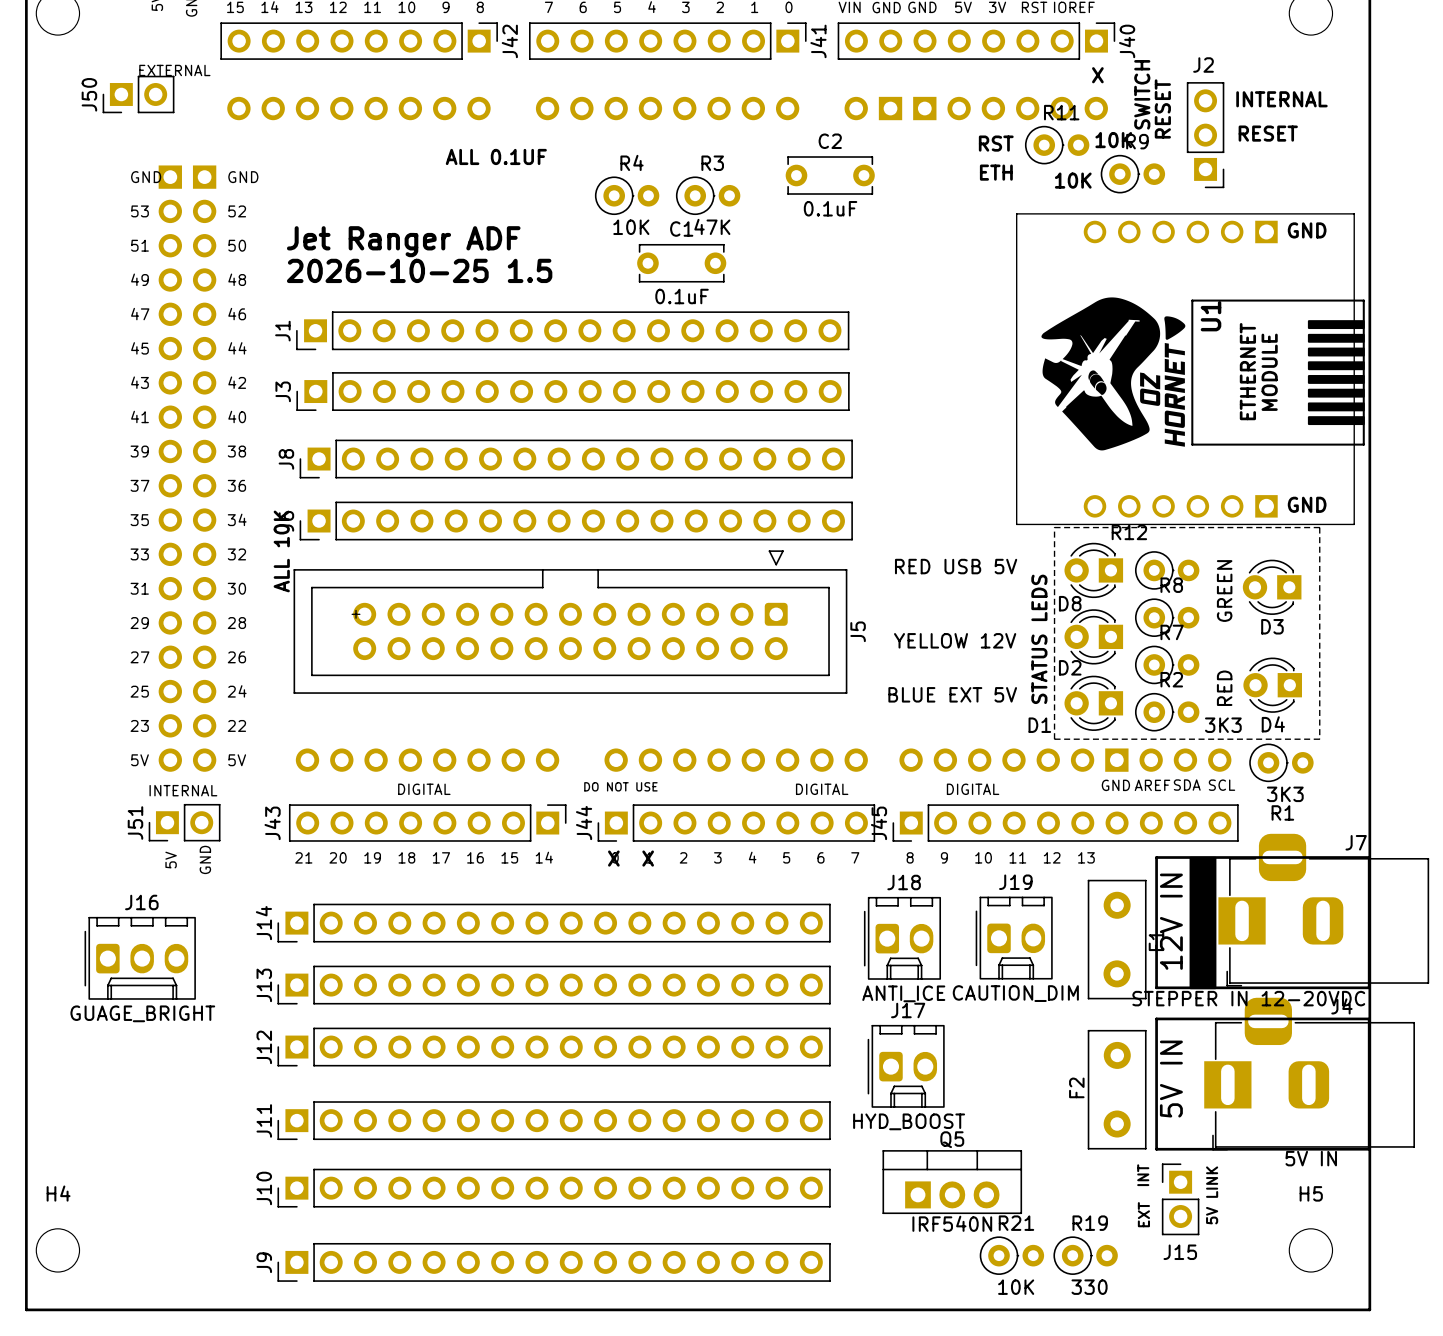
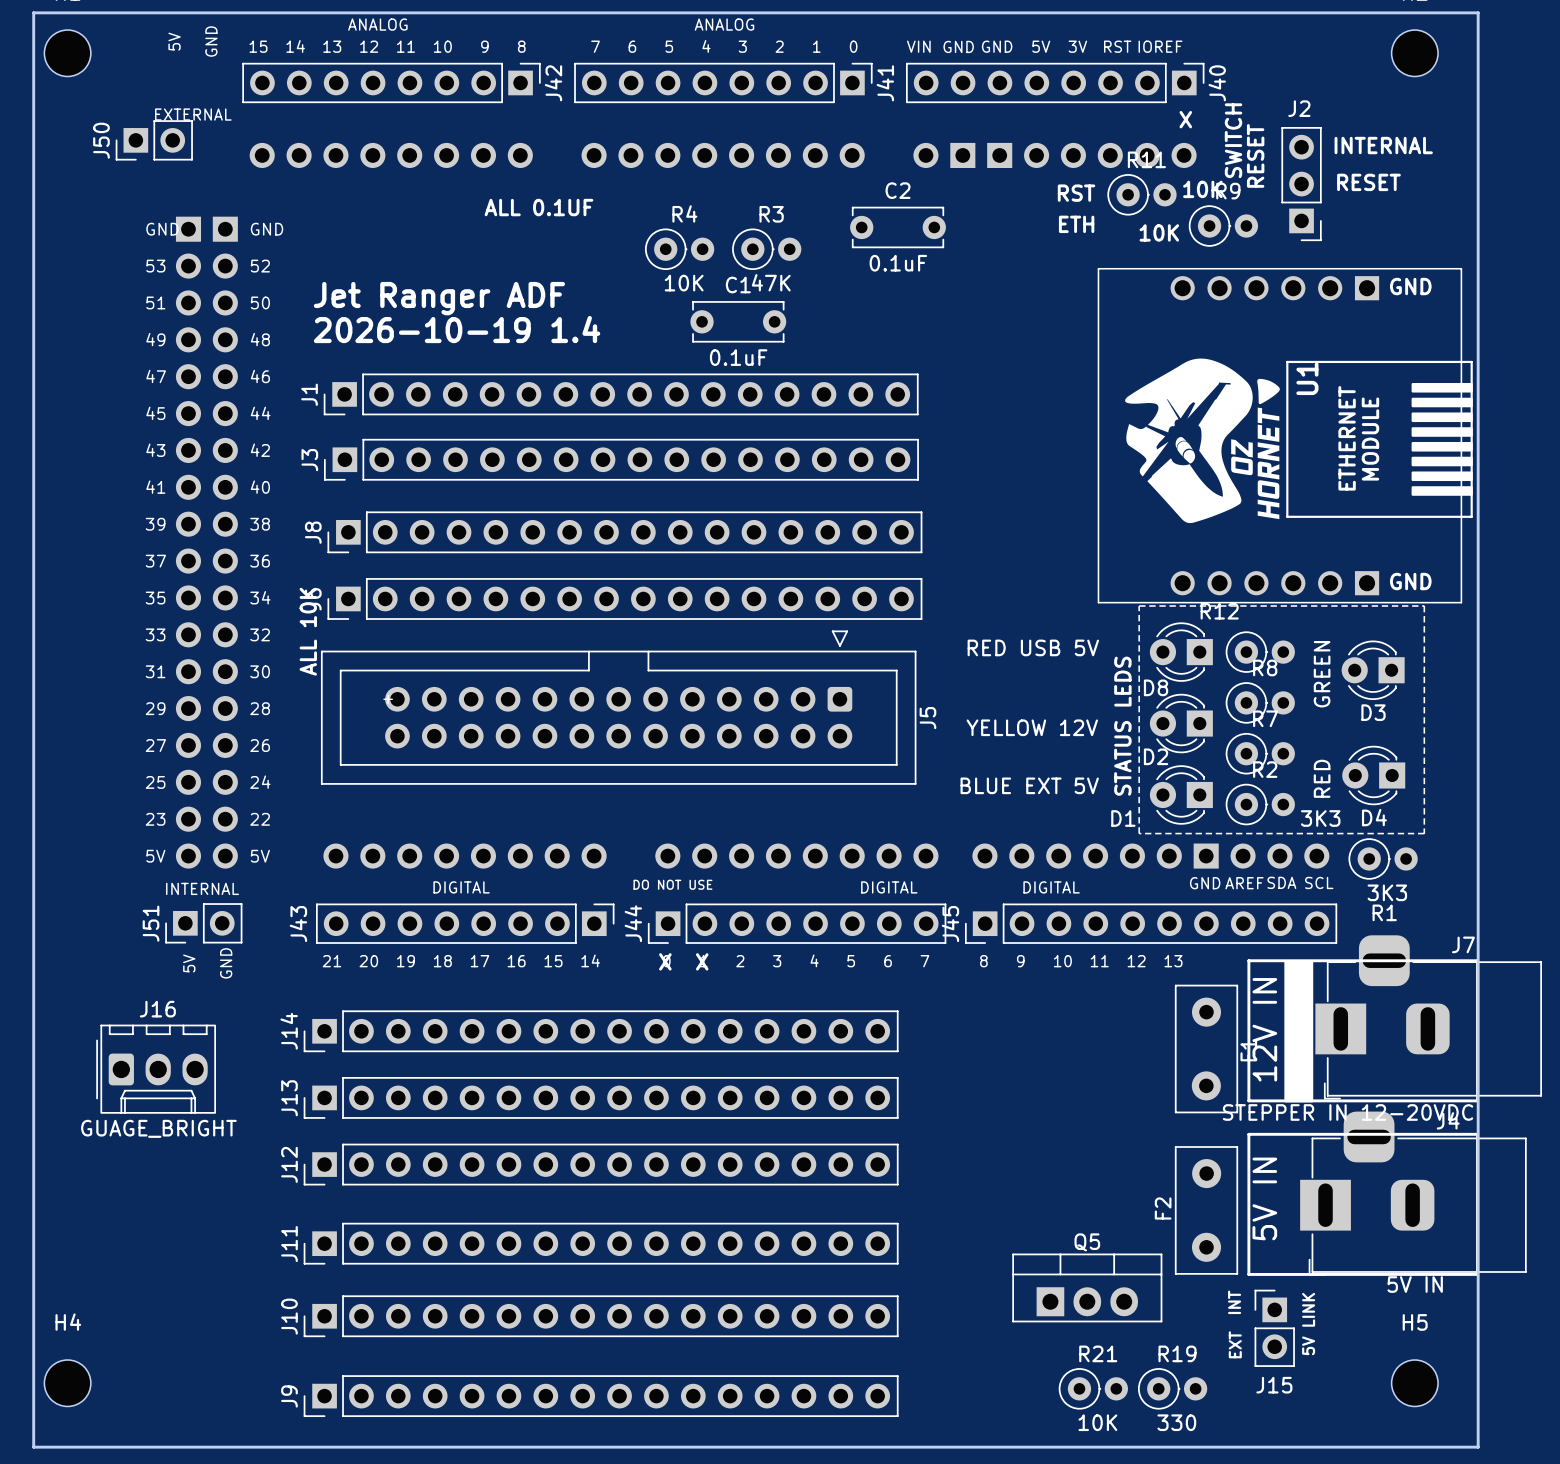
text: 2026-10-25 1.5 (419, 270) -> 2026-10-19 1.4 (457, 329)
J18: ANTI_ICE (902, 938) -> none
J19: CAUTION_DIM (1014, 938) -> none
J17: HYD_BOOST (906, 1066) -> none
Q5 position: (952, 1182) -> (1087, 1287)
Q5 value: IRF540N (952, 1223) -> none

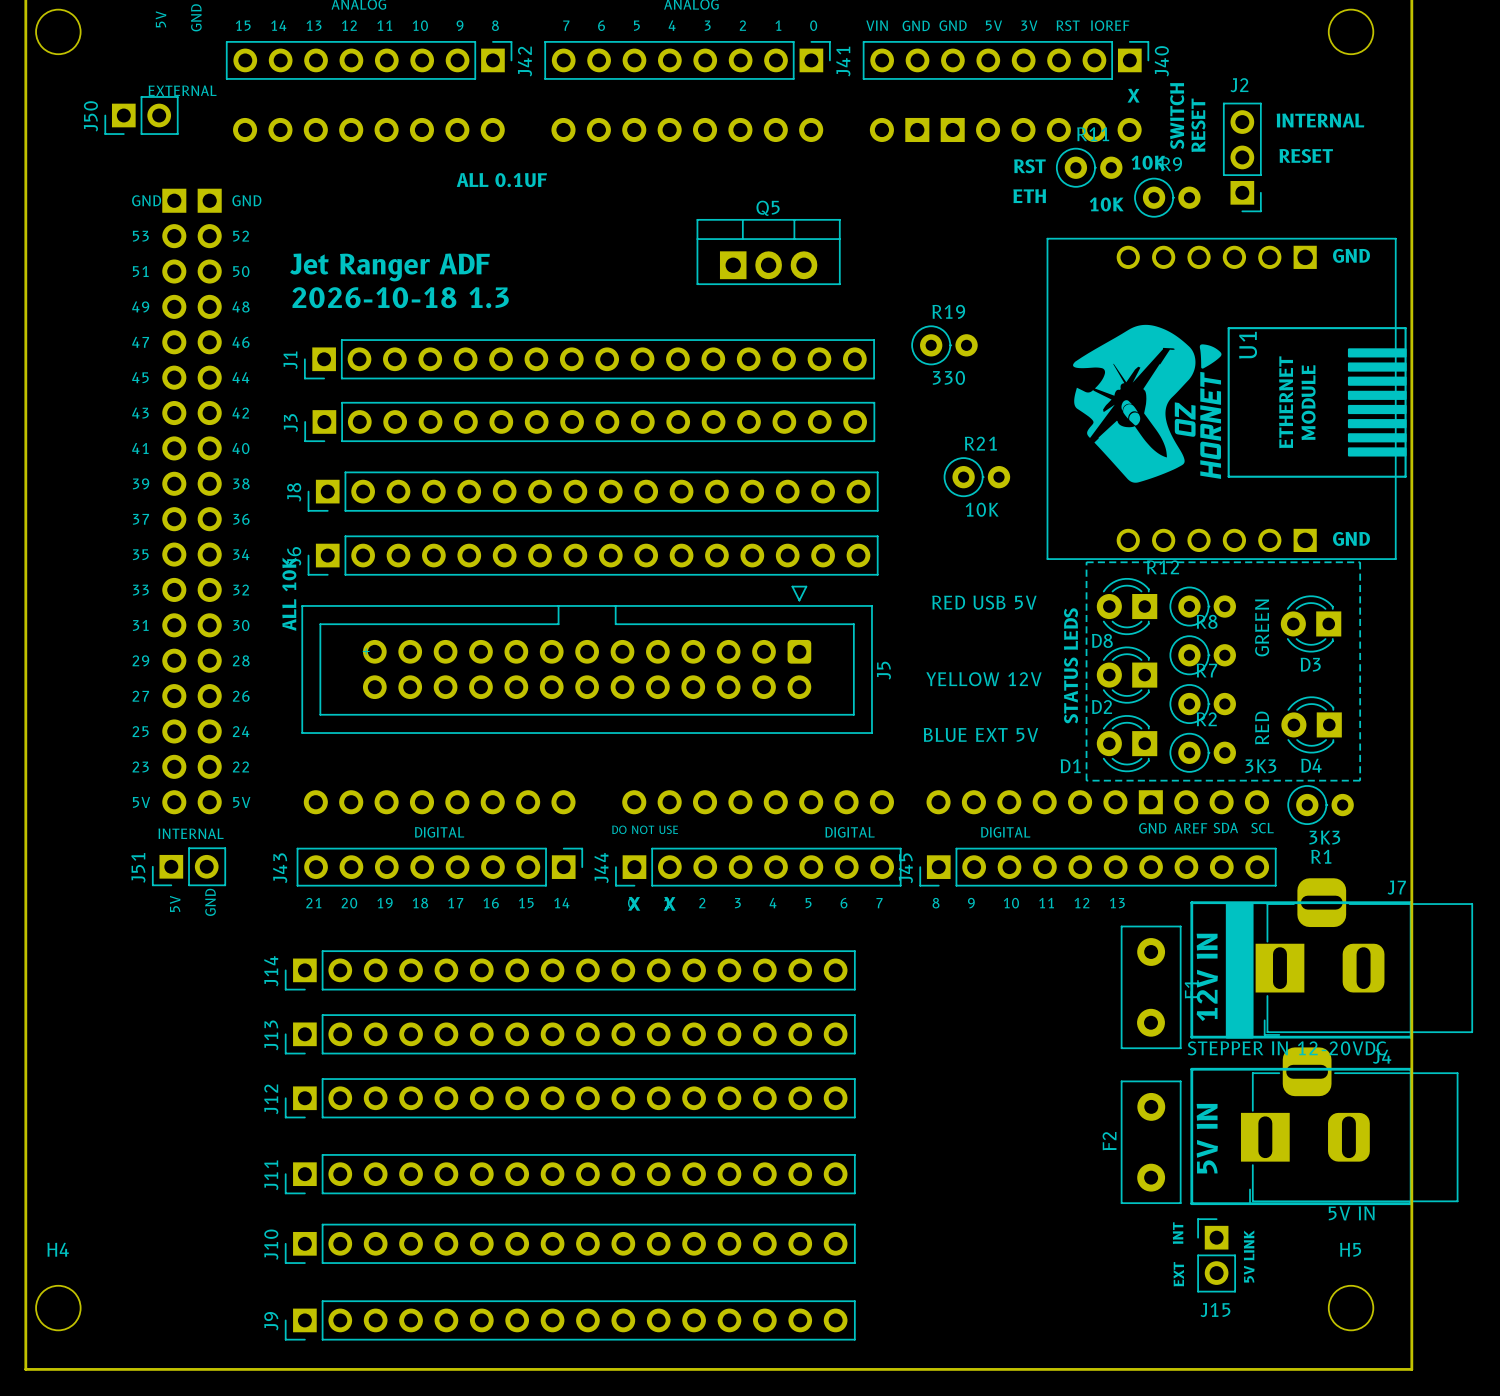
C2: 0.1uF (898, 227) -> none
R4: 10K (679, 249) -> none
R3: 47K (766, 249) -> none
C1: 0.1uF (738, 321) -> none
text: 2026-10-19 1.4 (457, 329) -> 2026-10-18 1.3 (400, 297)
J16: GUAGE_BRIGHT (156, 1069) -> none
Q5 position: (1087, 1287) -> (768, 252)
R21 position: (1093, 1388) -> (976, 477)
R19 position: (1172, 1388) -> (944, 345)

